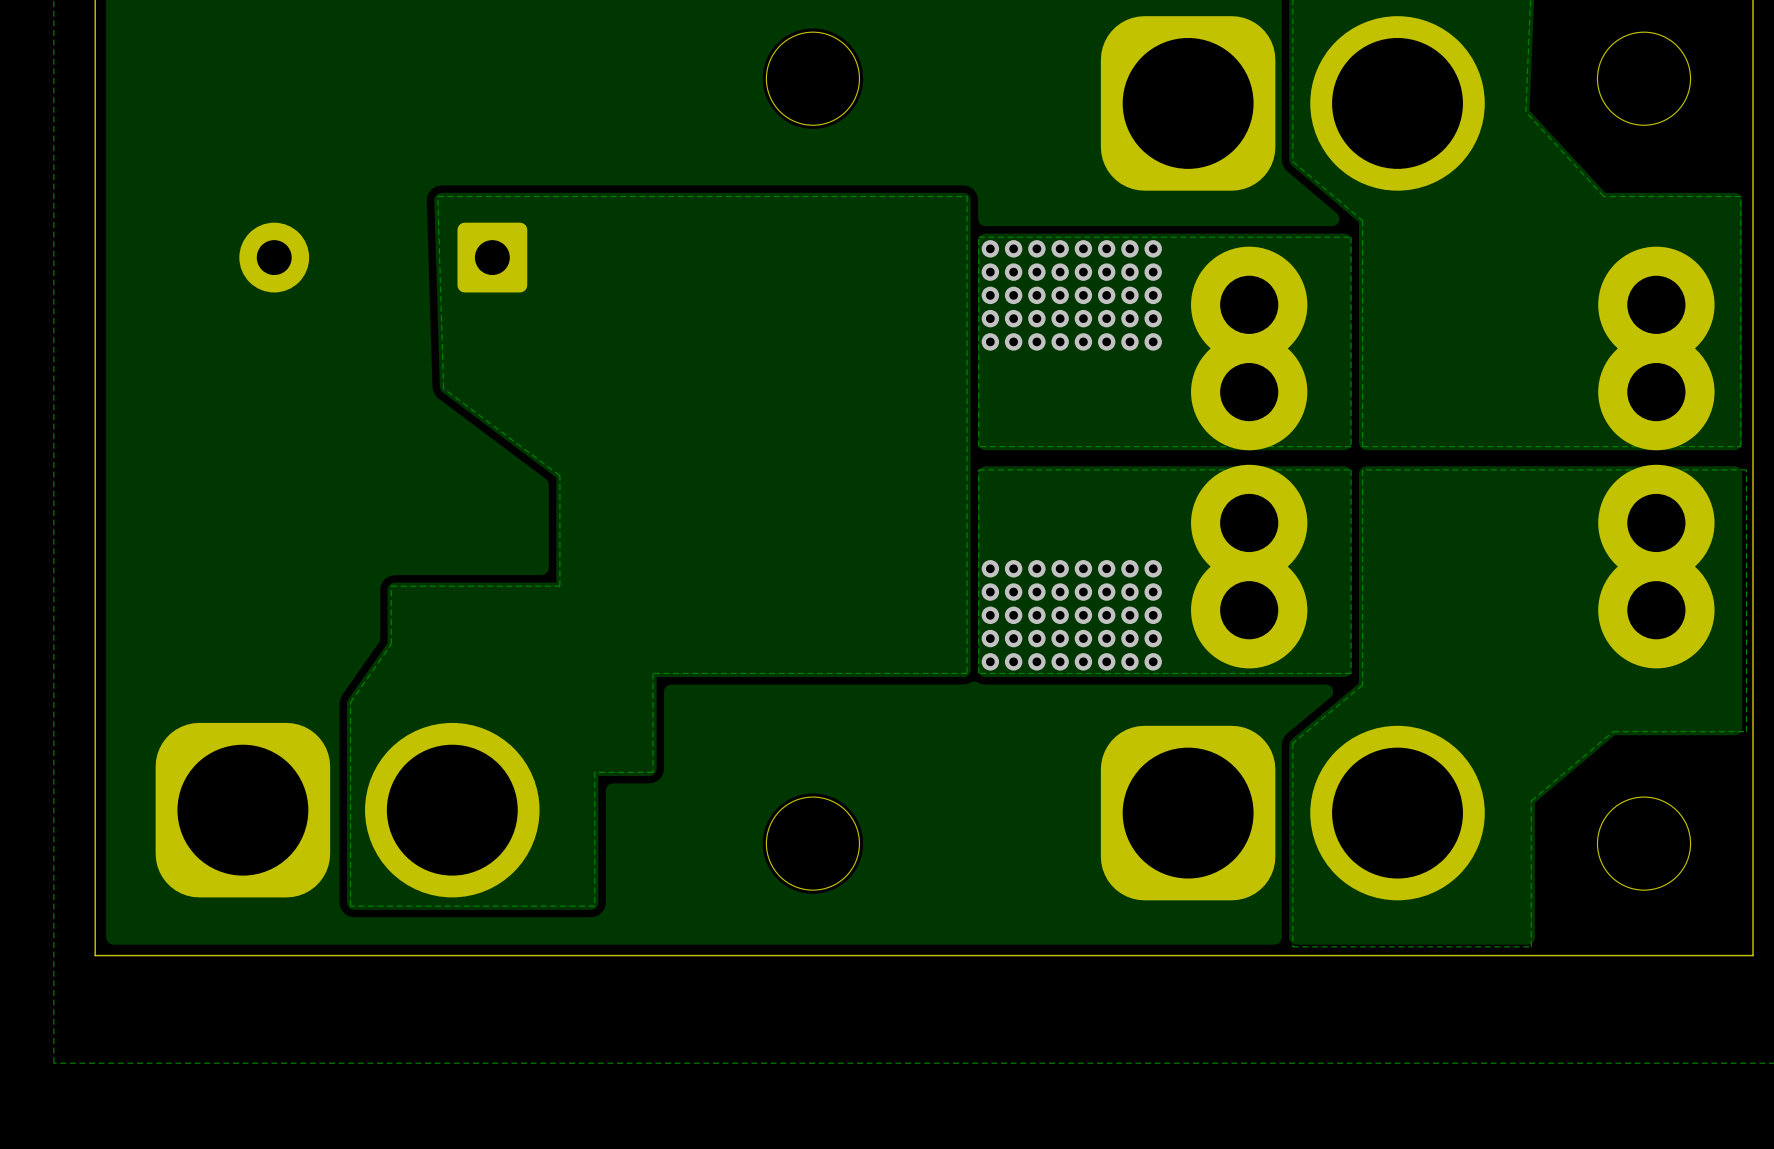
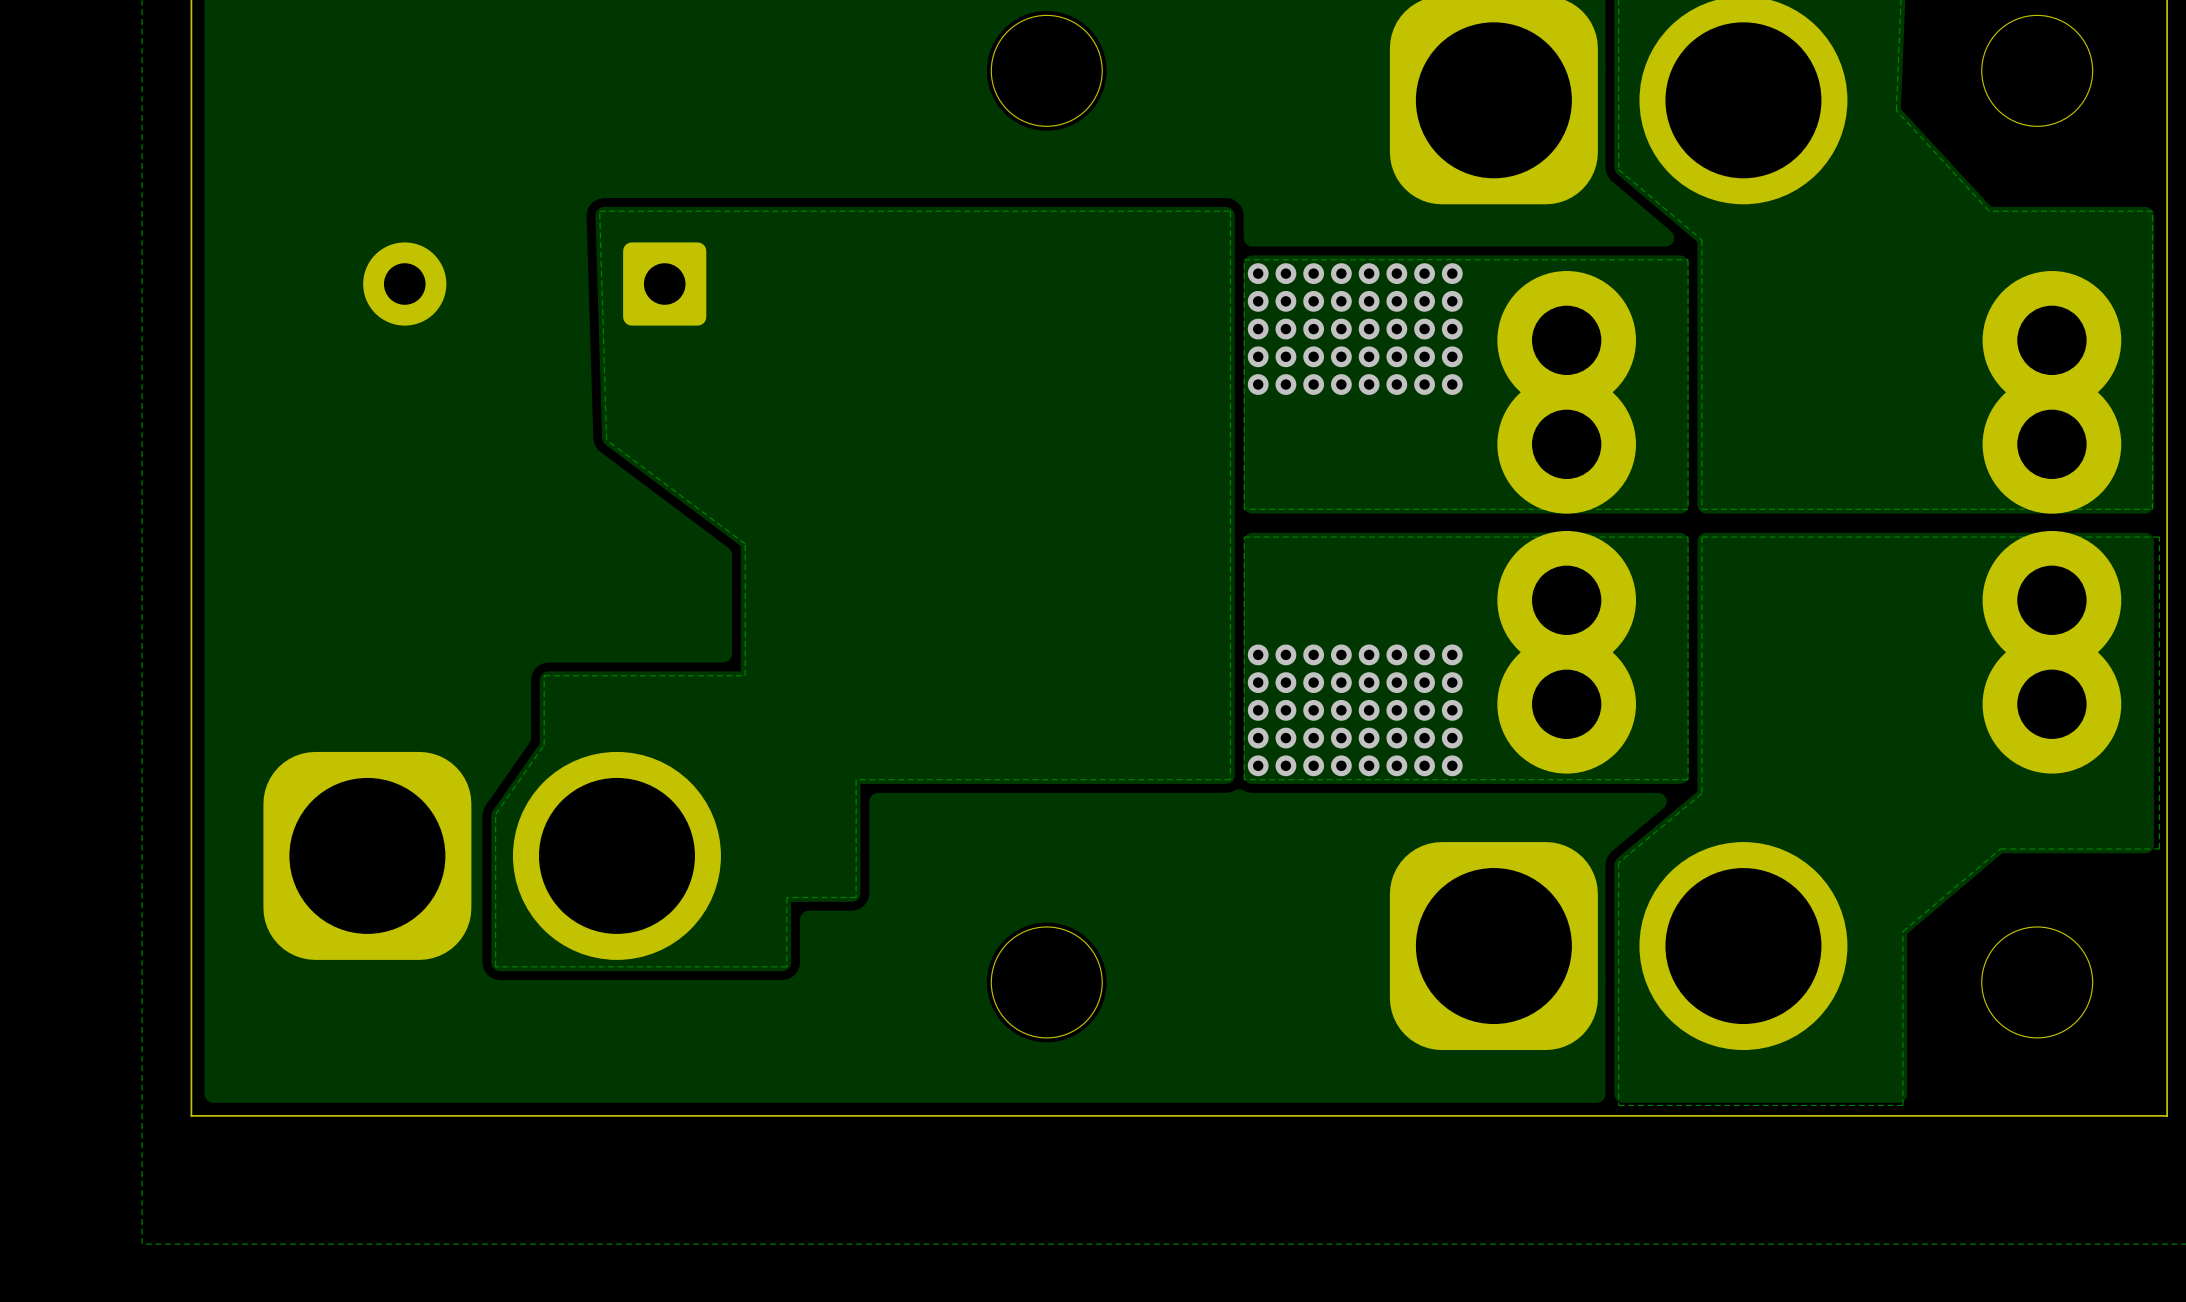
part position: (347, 810) -> (492, 855)
zone outline: (594, 830) (594, 906) (350, 906) (350, 830) -> (786, 966) (495, 966)

